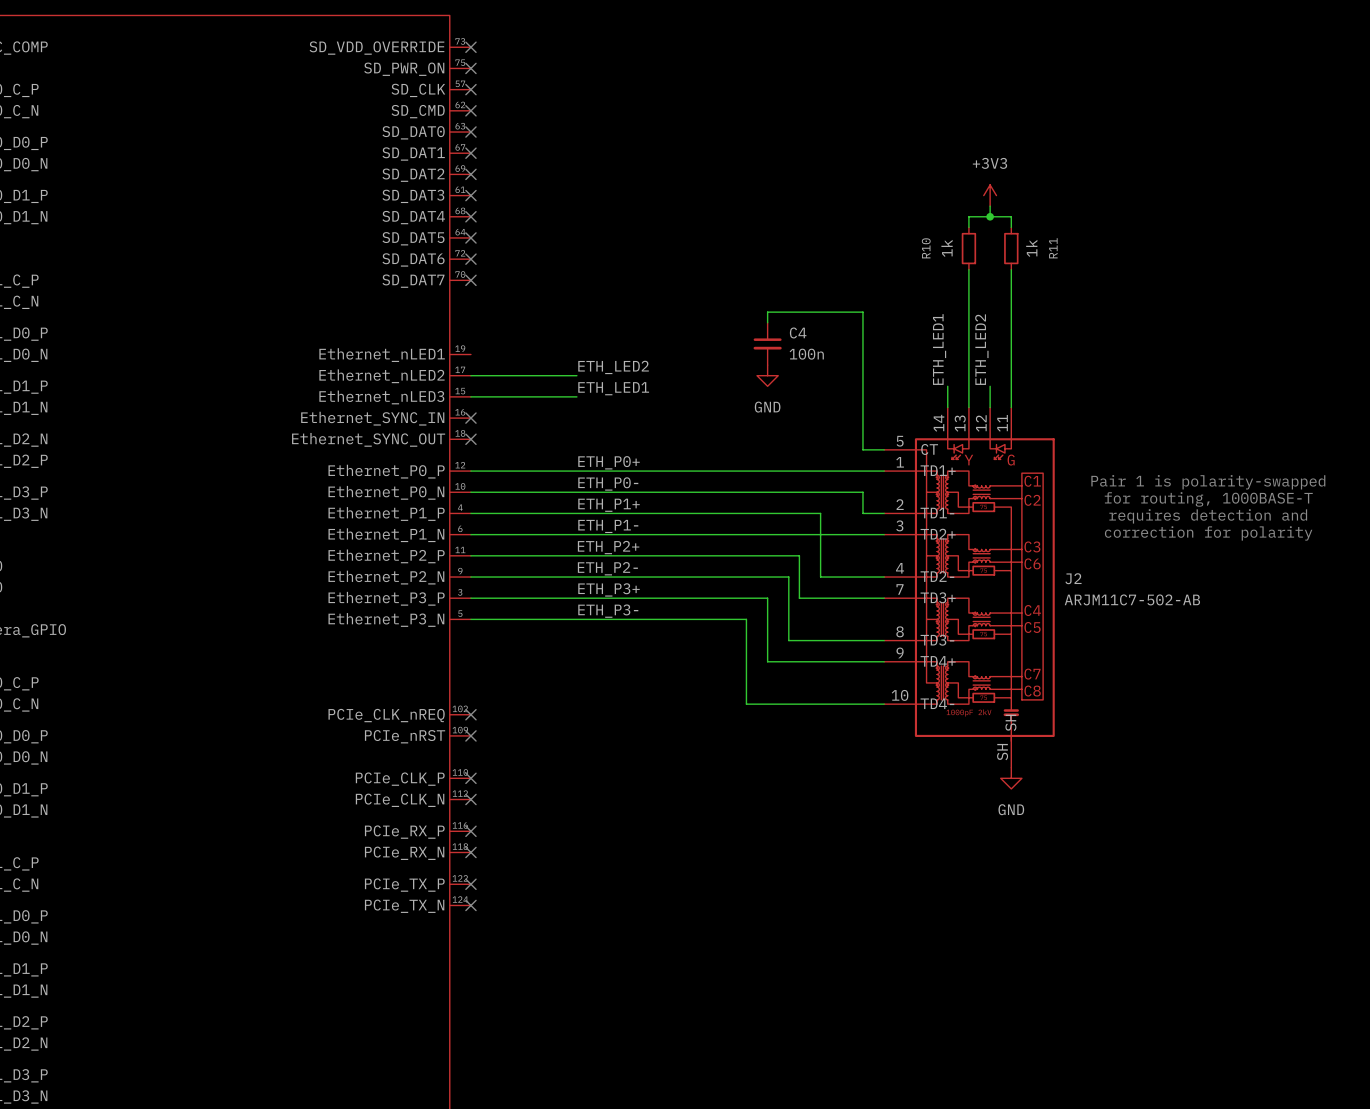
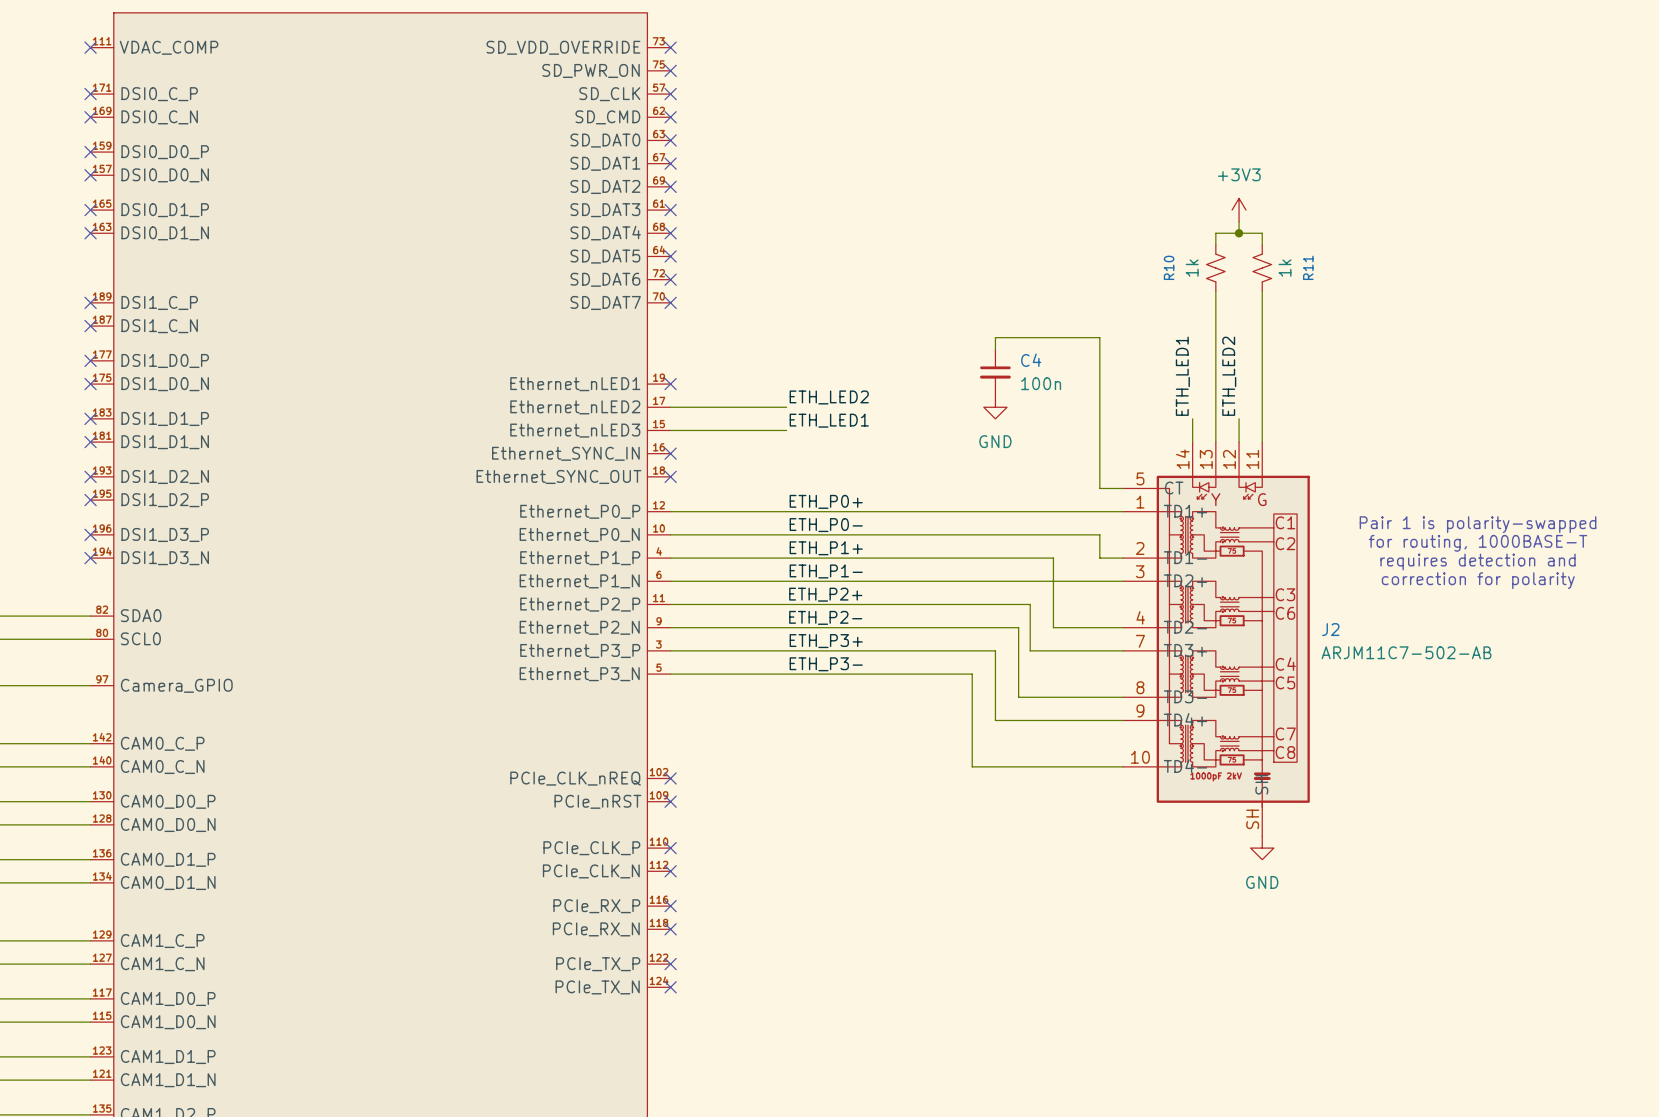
R10 symbol: [961, 227, 977, 270] -> [1206, 244, 1226, 292]
R11 symbol: [1004, 227, 1019, 270] -> [1252, 244, 1272, 292]
no-connect mark: none -> (670, 384)

